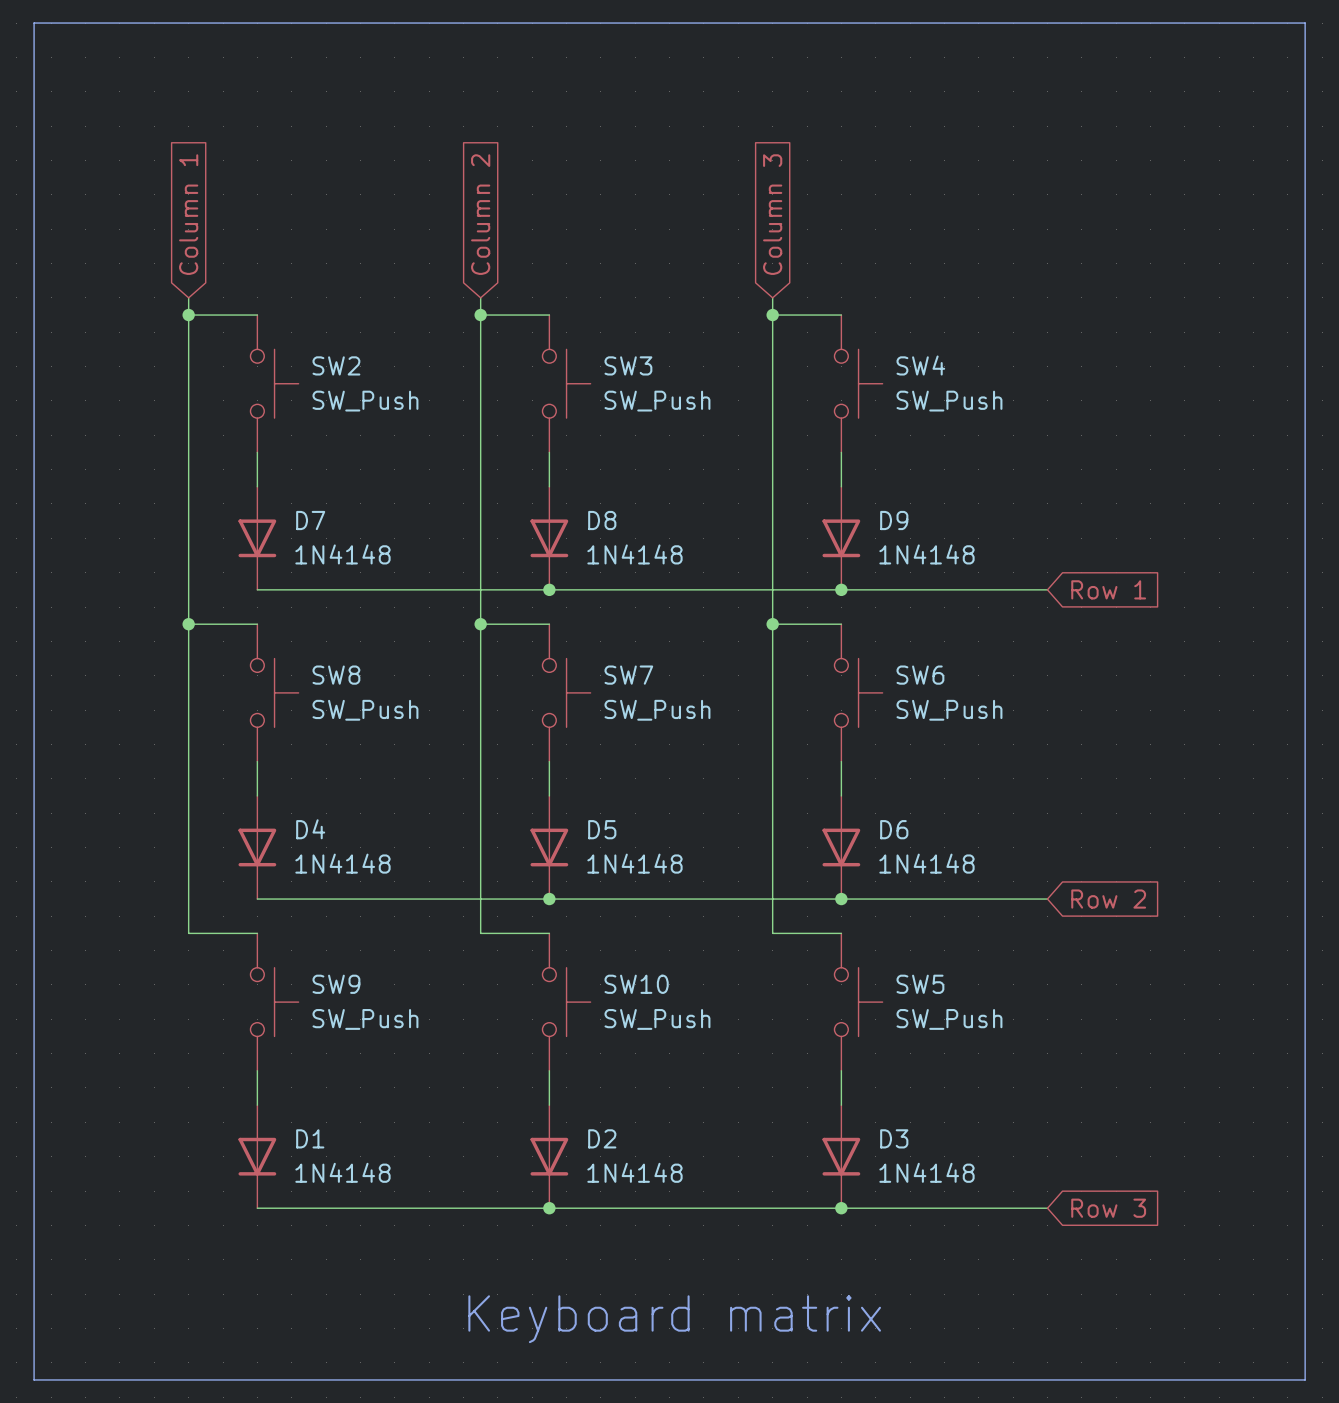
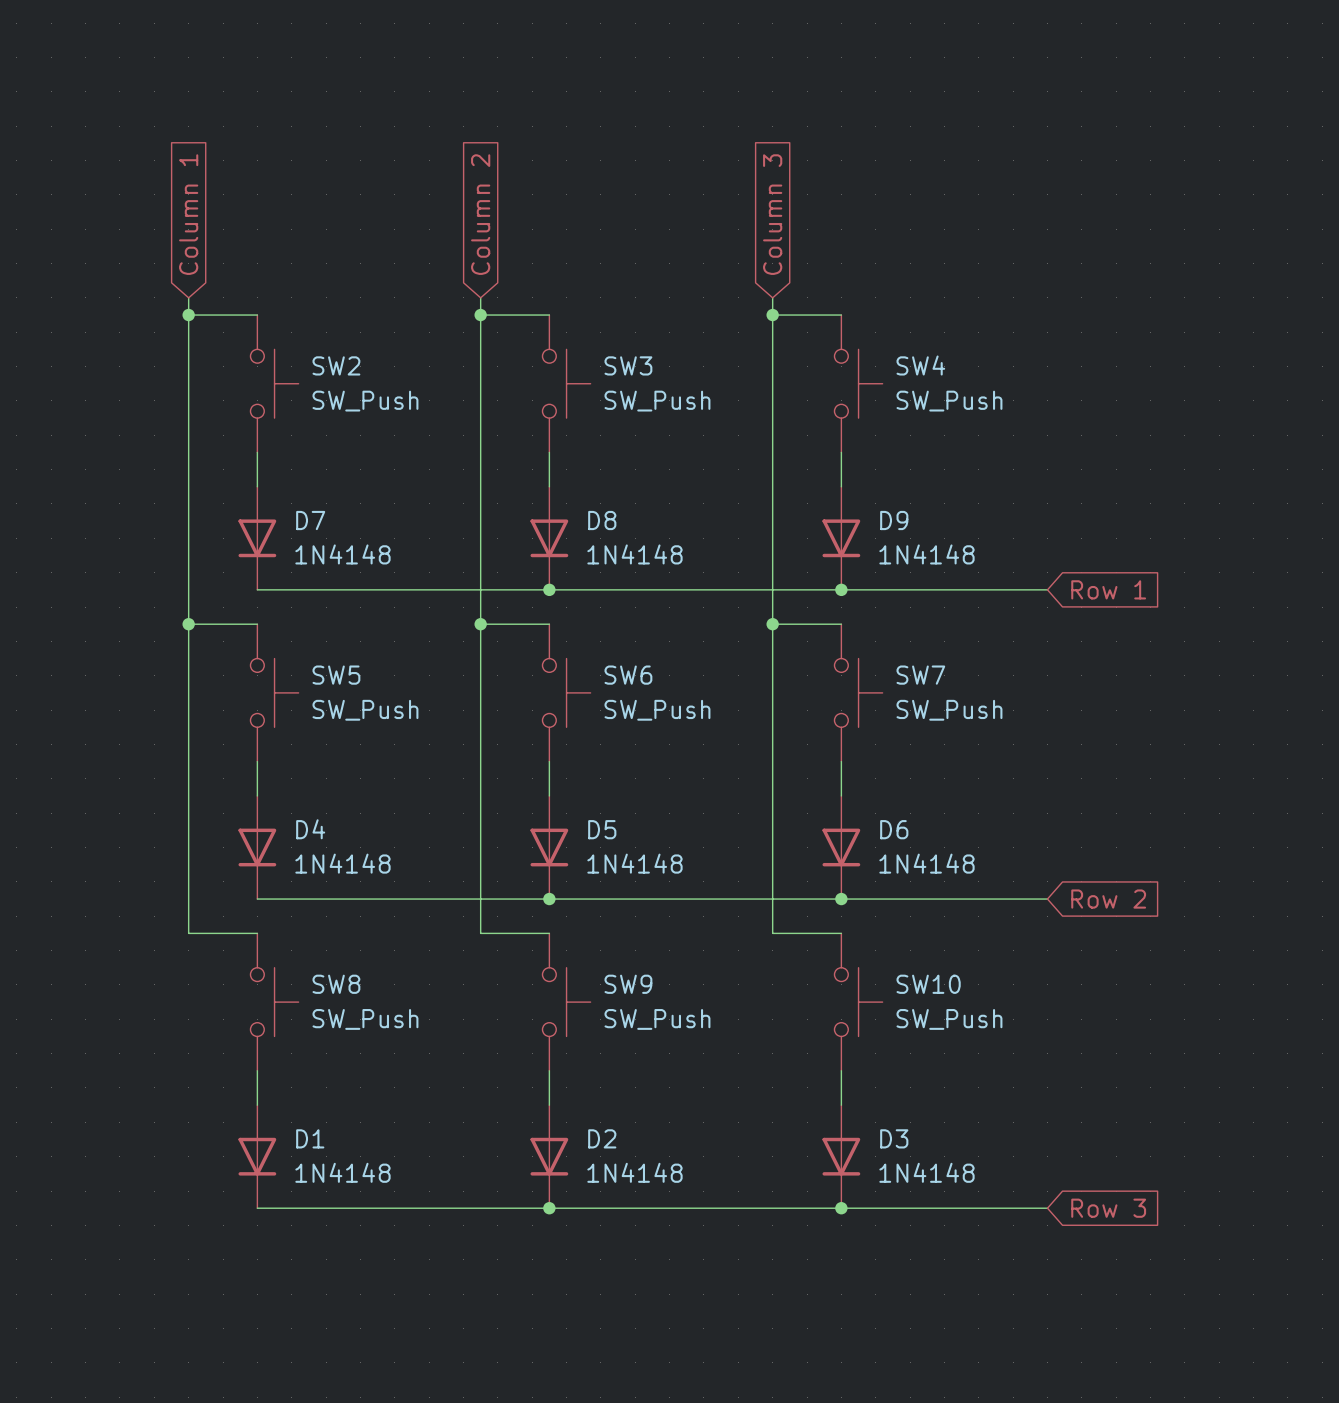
line: (34, 23) (1305, 23) (1305, 1379) (34, 1379) (34, 23) -> none
SW8 name: SW8 (336, 675) -> SW5 (336, 675)
SW7 name: SW7 (628, 675) -> SW6 (628, 675)
SW6 name: SW6 (920, 675) -> SW7 (920, 675)
SW9 name: SW9 (336, 984) -> SW8 (336, 984)
SW10 name: SW10 (636, 984) -> SW9 (628, 984)
SW5 name: SW5 (920, 984) -> SW10 (928, 984)
text: Keyboard matrix (674, 1319) -> none

